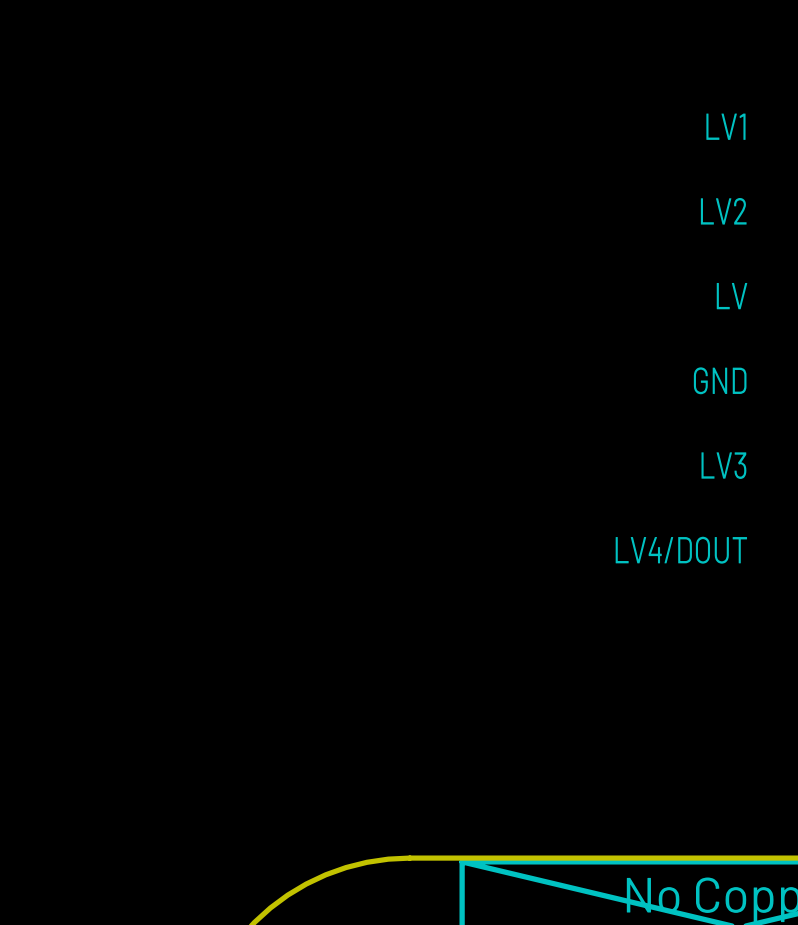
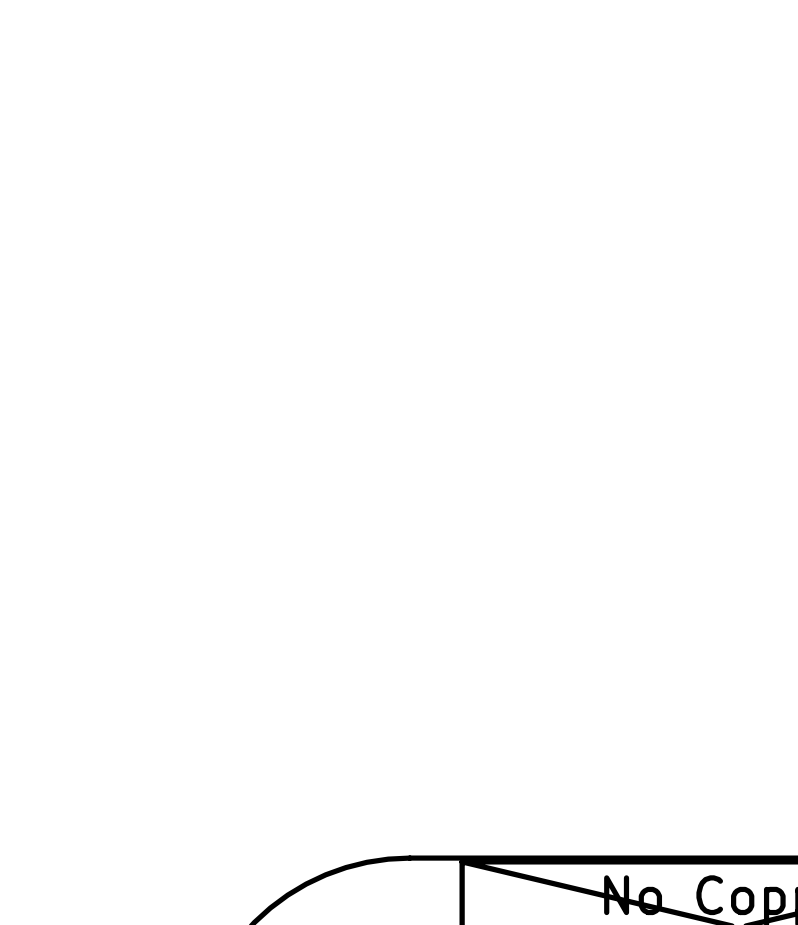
text: LV1 (725, 126) -> none
text: LV2 (723, 211) -> none
text: LV (732, 296) -> none
text: GND (720, 380) -> none
text: LV3 (723, 465) -> none
text: LV4/DOUT (681, 550) -> none

